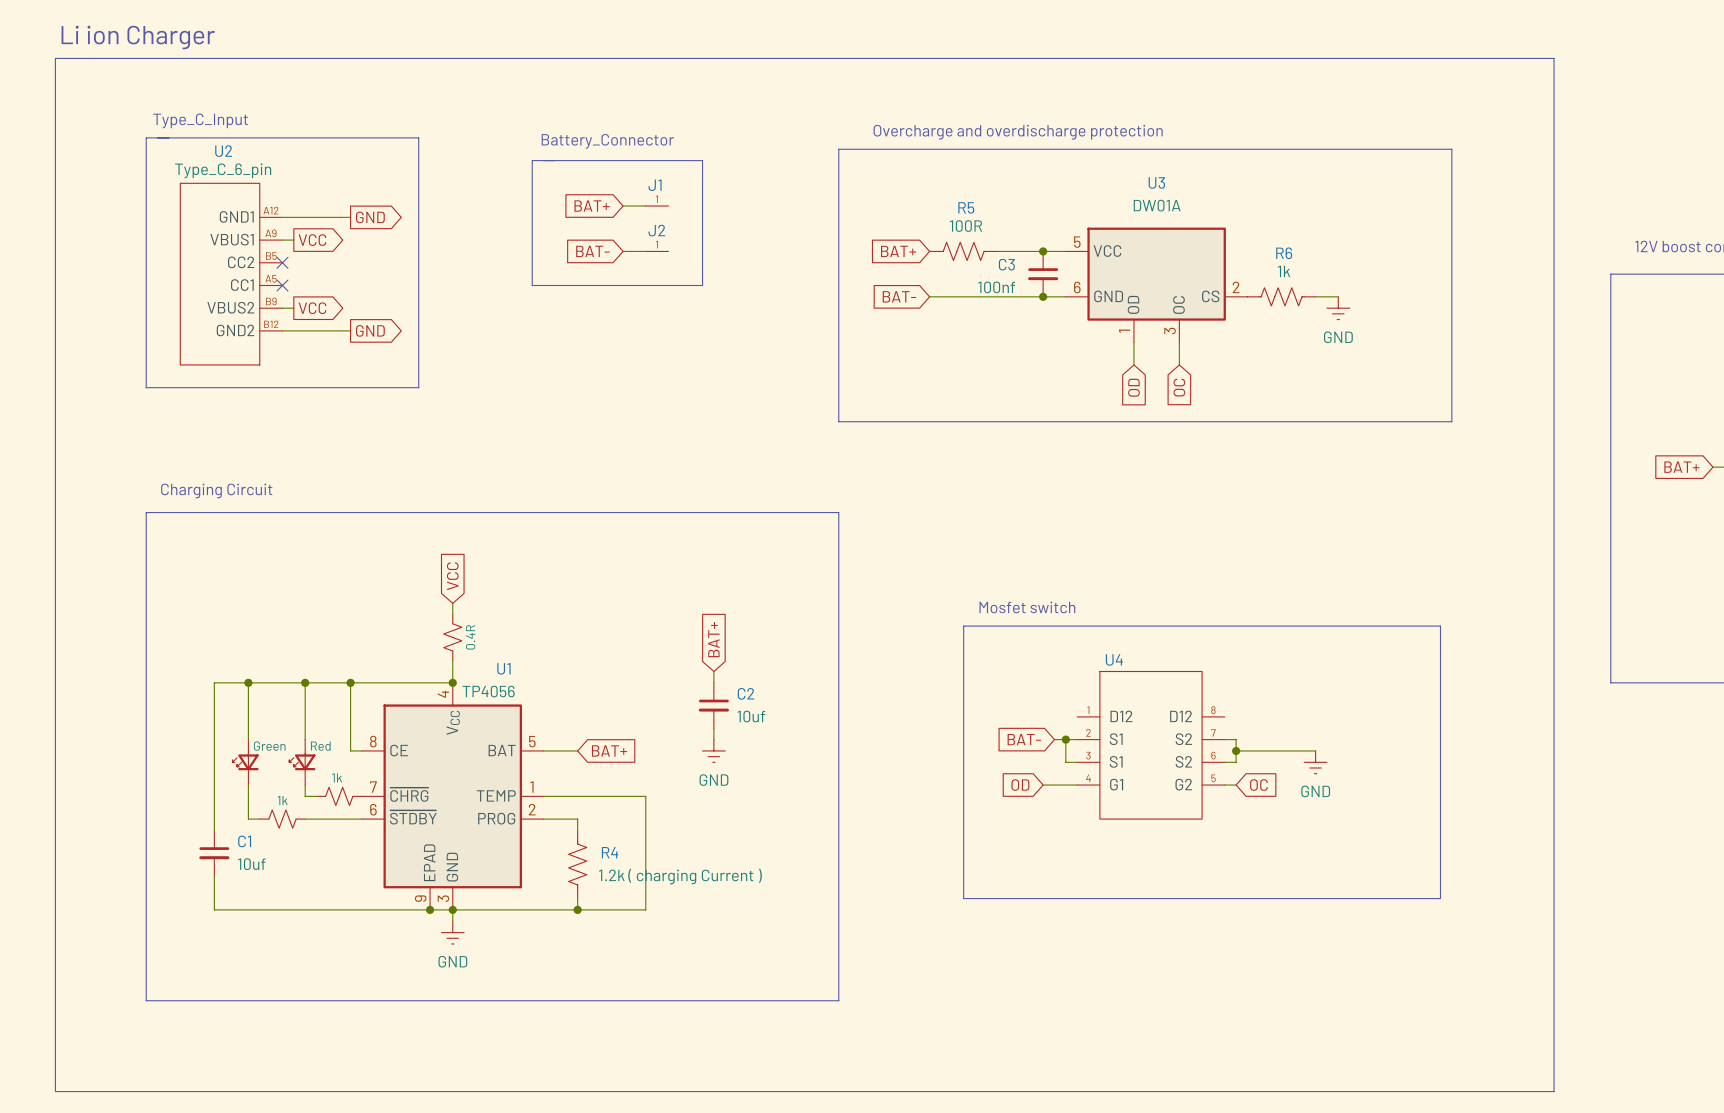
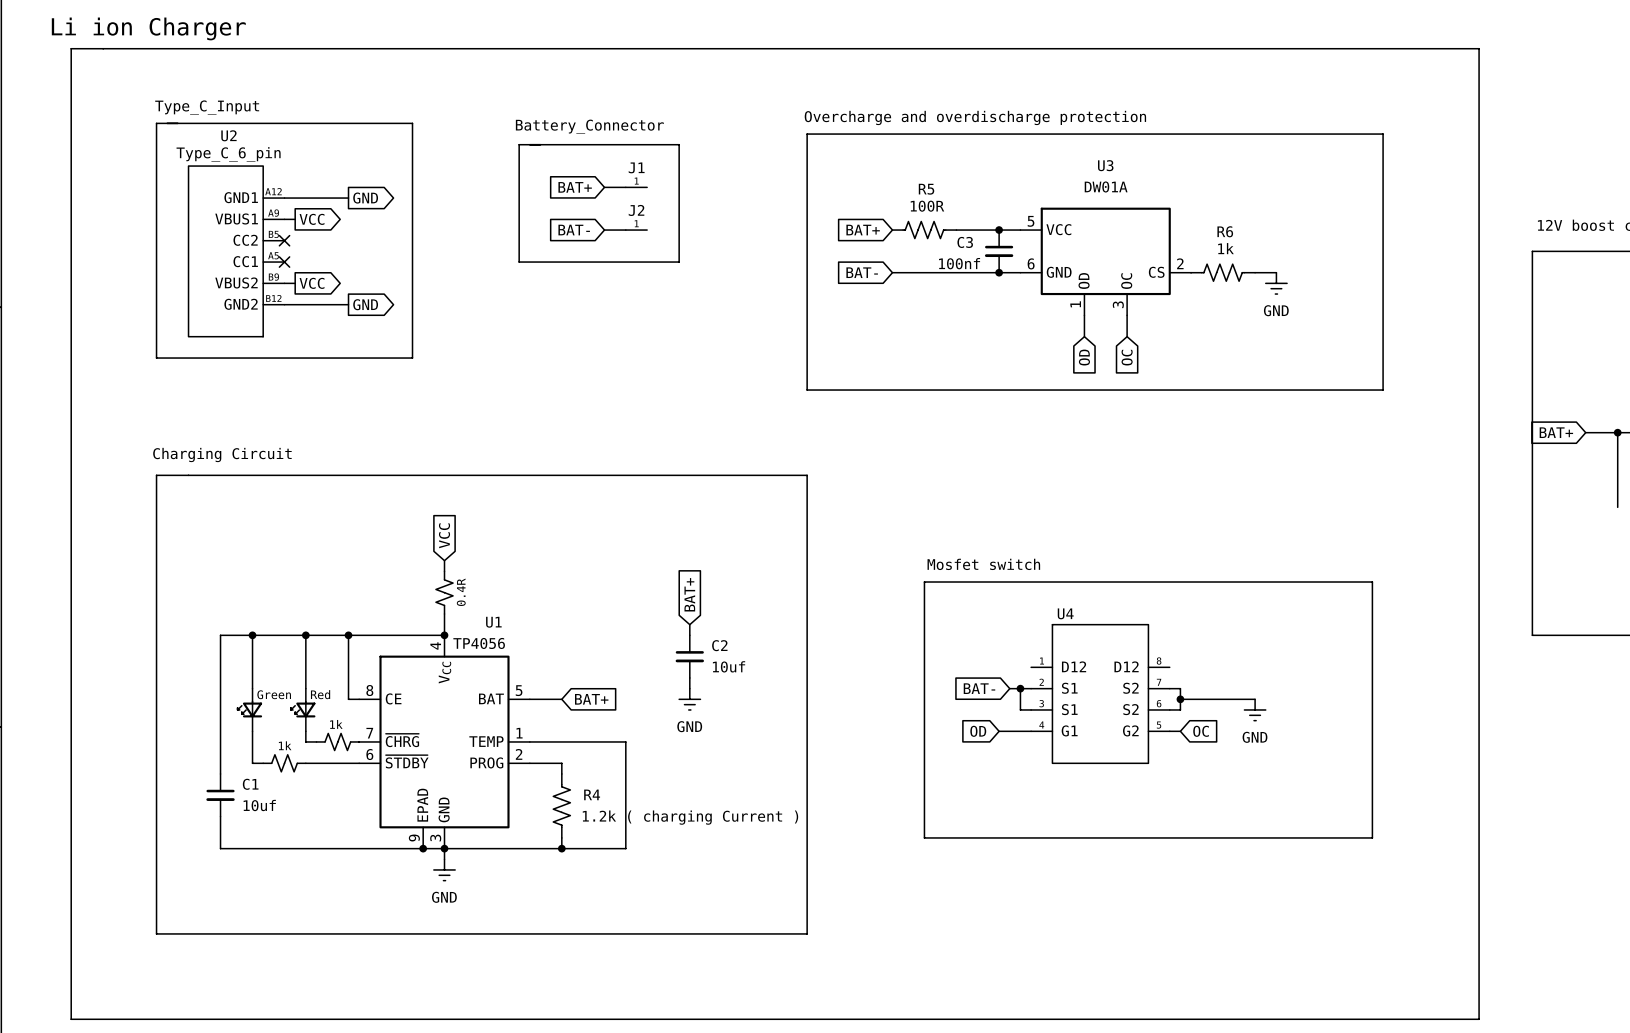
wire: none -> (1585, 432) (1628, 432)
global label position: BAT+ (1681, 467) -> BAT+ (1556, 432)
wire: none -> (1617, 432) (1617, 507)
junction: none -> (1617, 432)

